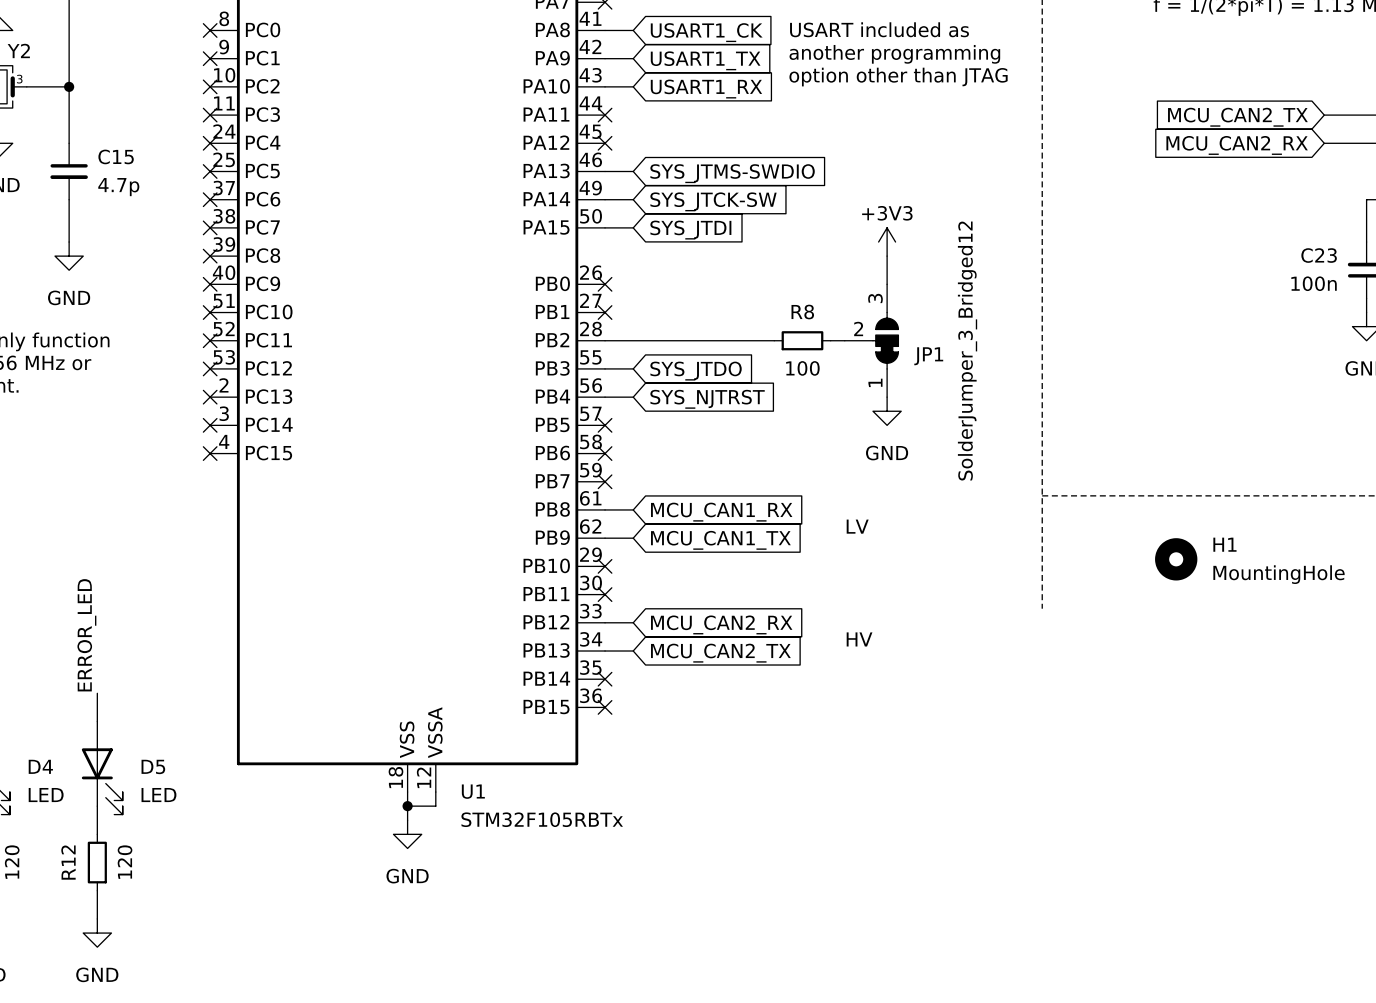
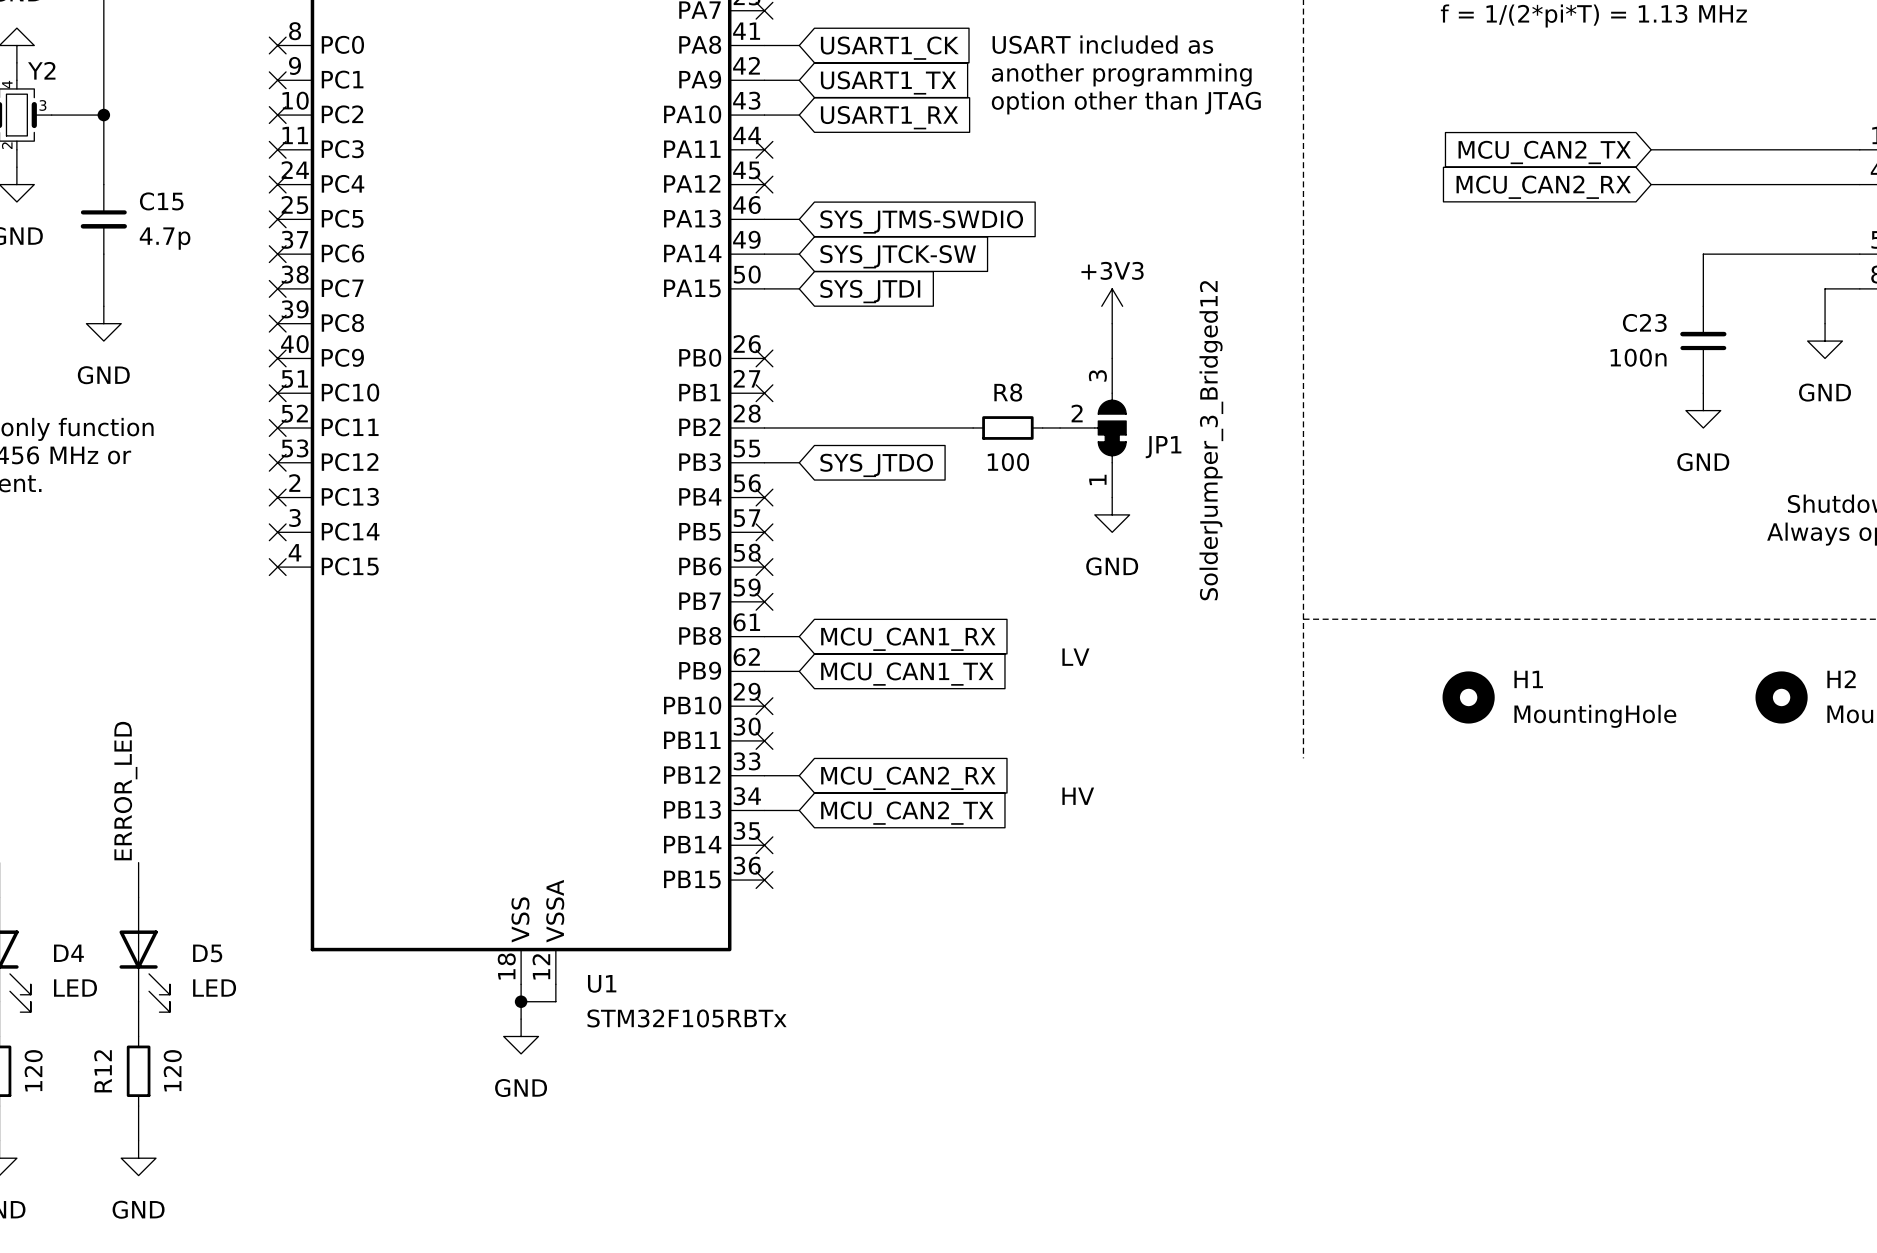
wire: (605, 397) (633, 397) -> none
no-connect mark: none -> (764, 497)
global label: SYS_NJTRST (707, 399) -> none

